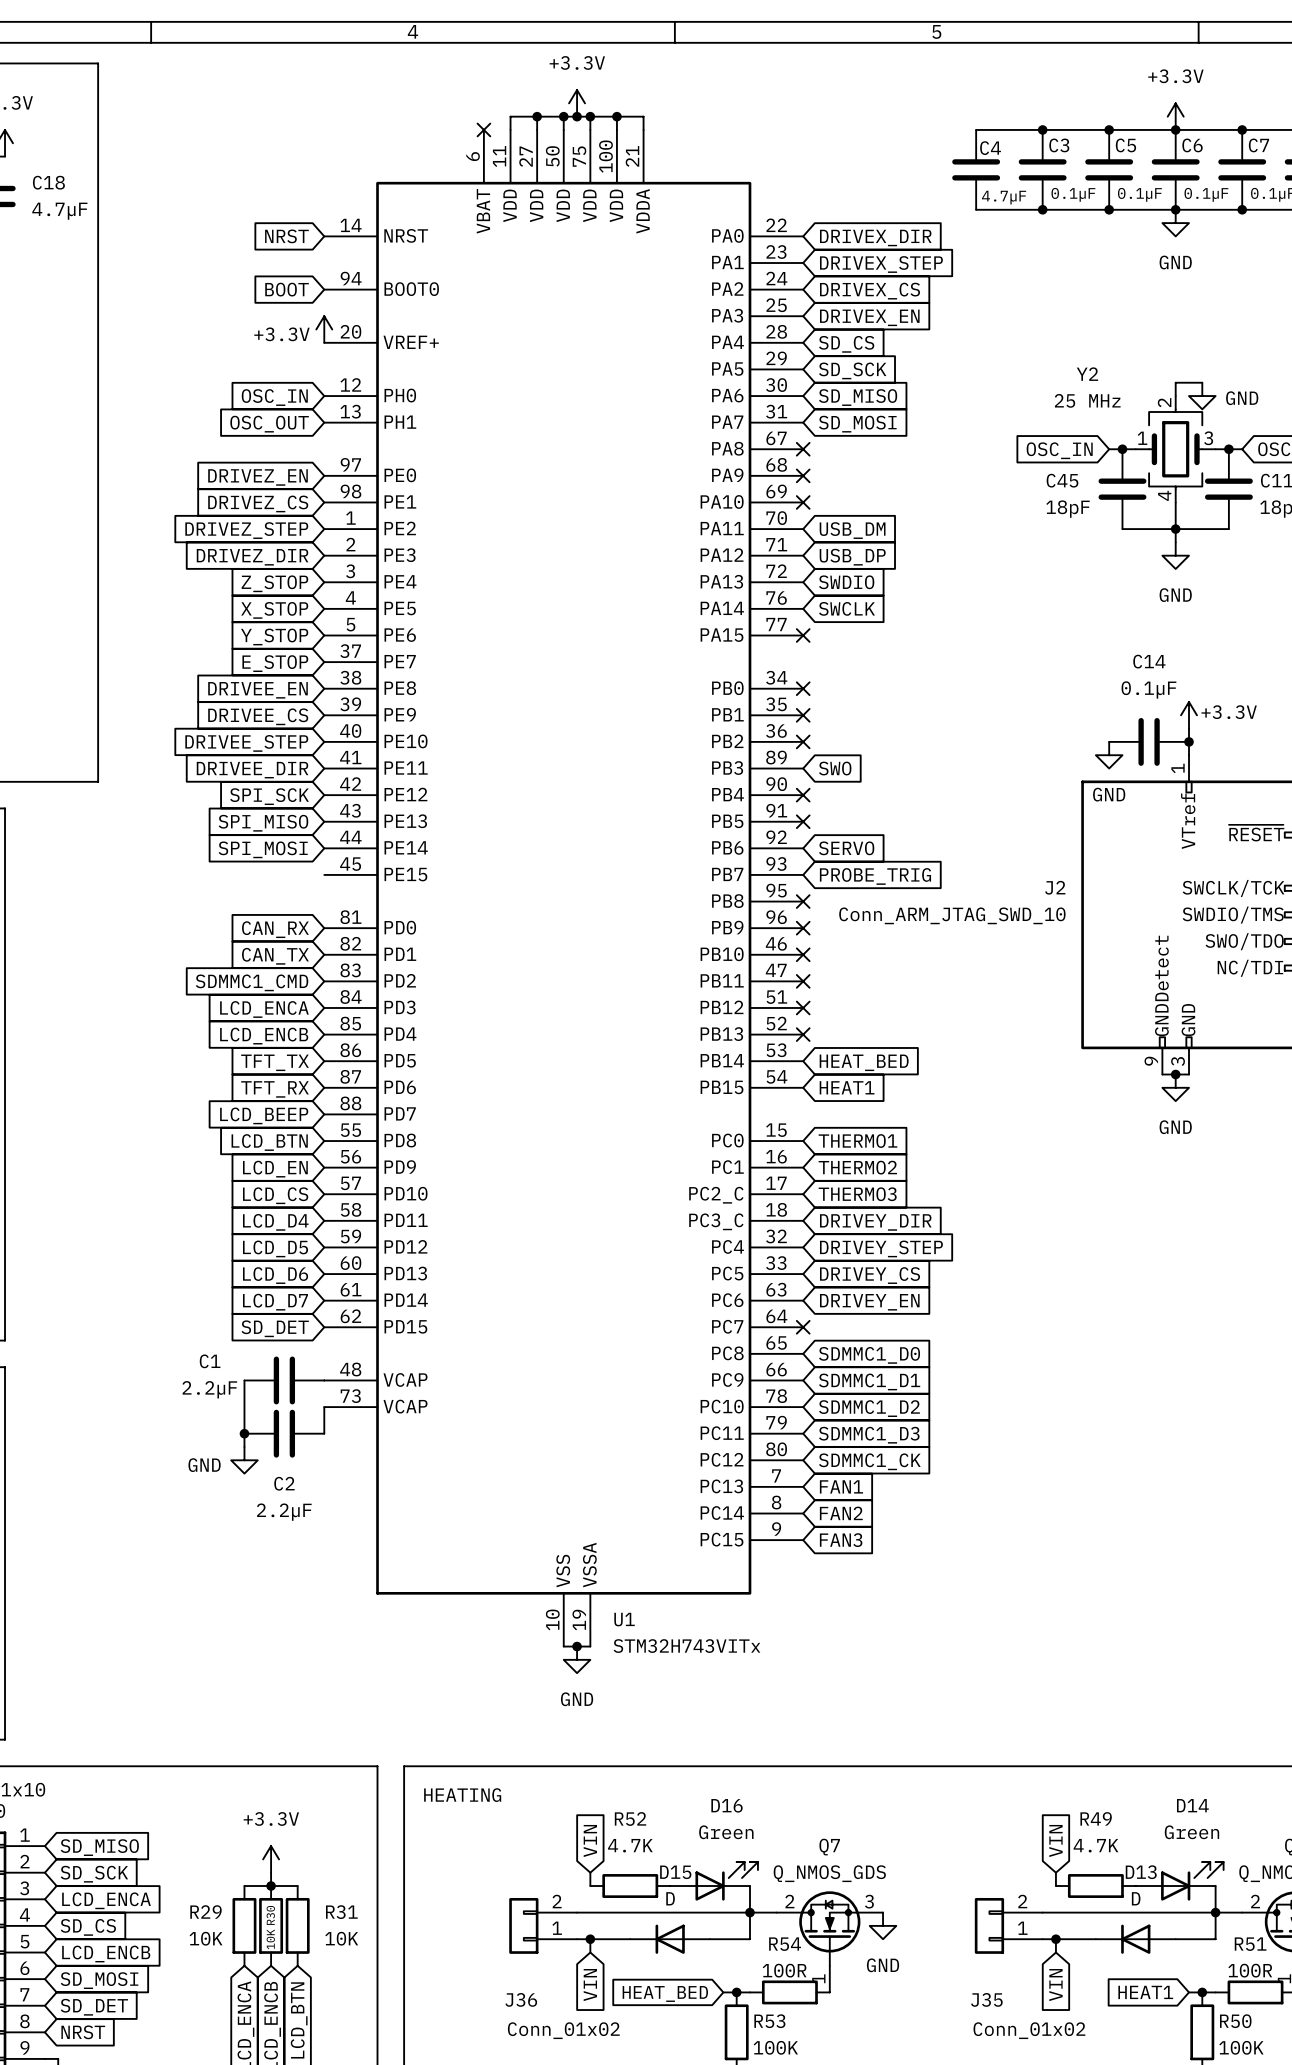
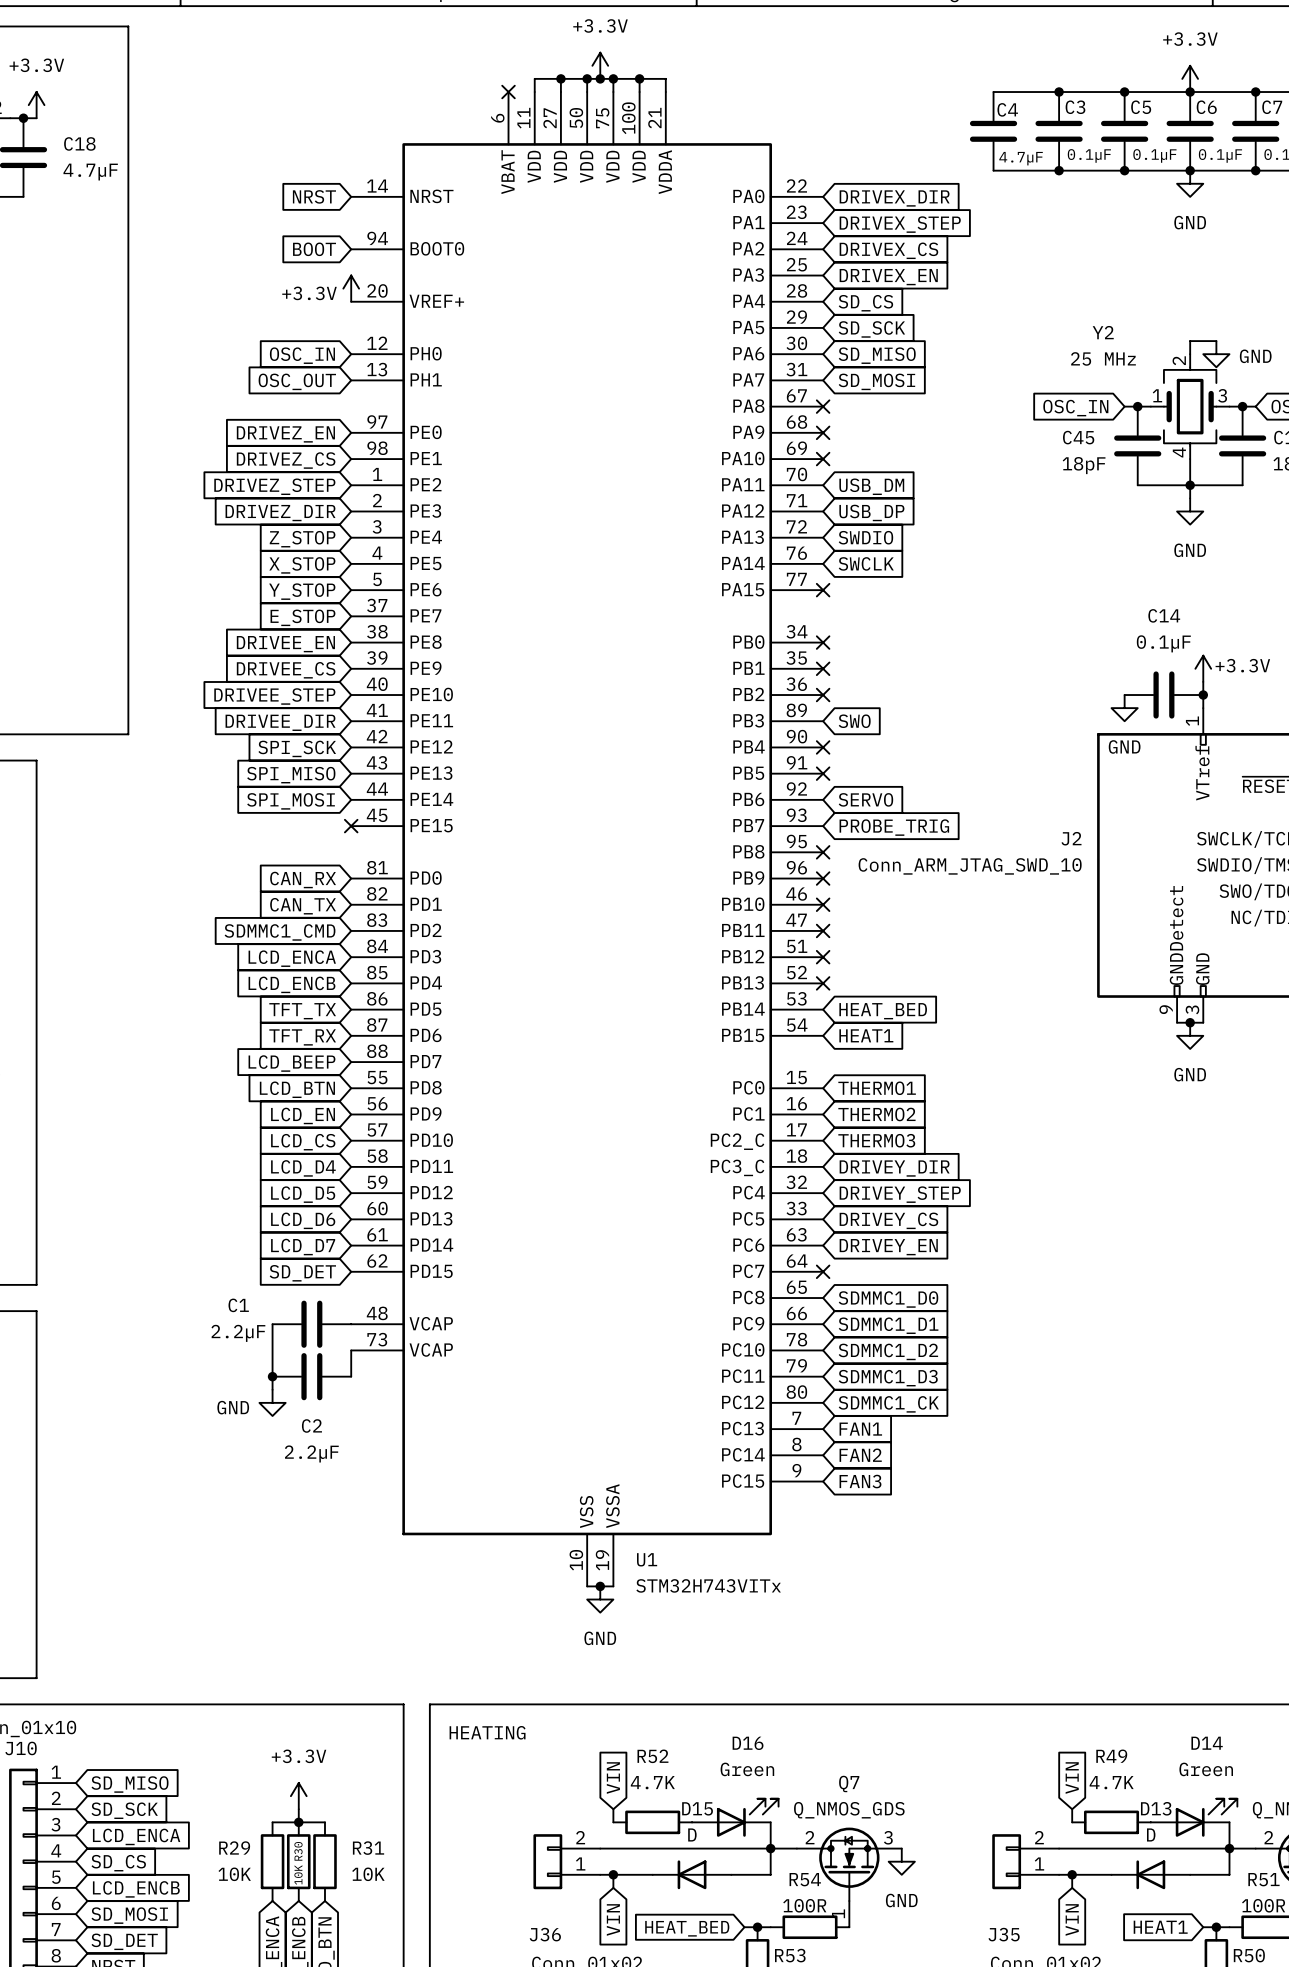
no-connect mark: none -> (351, 826)

